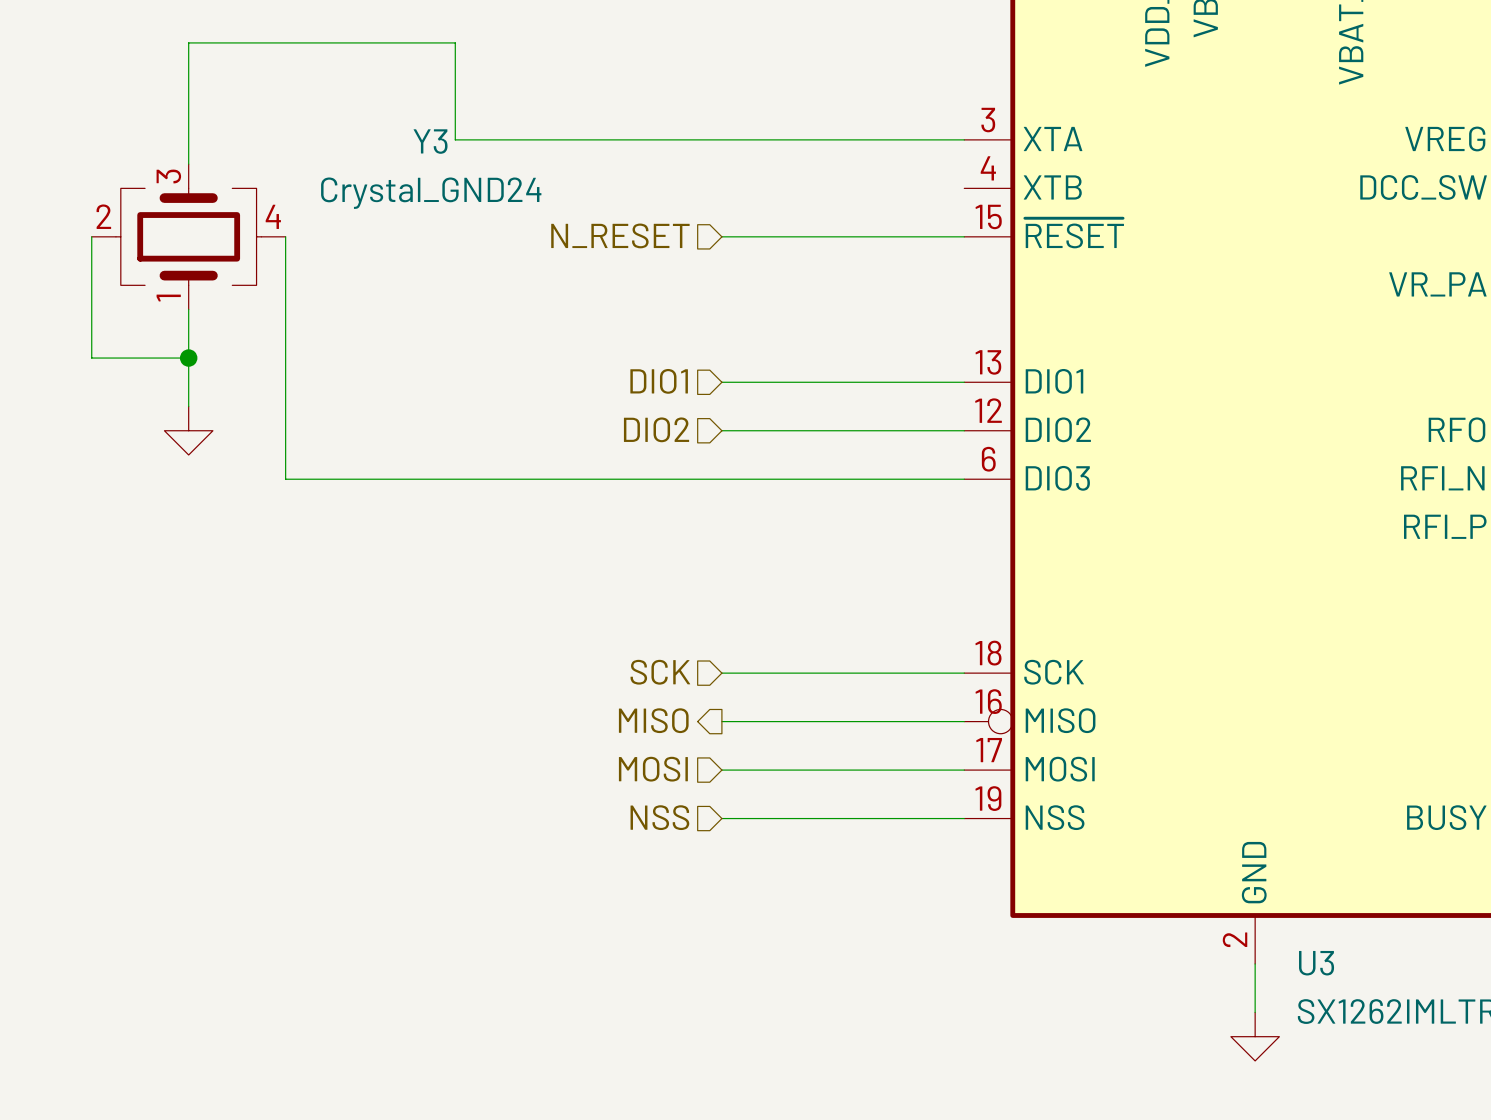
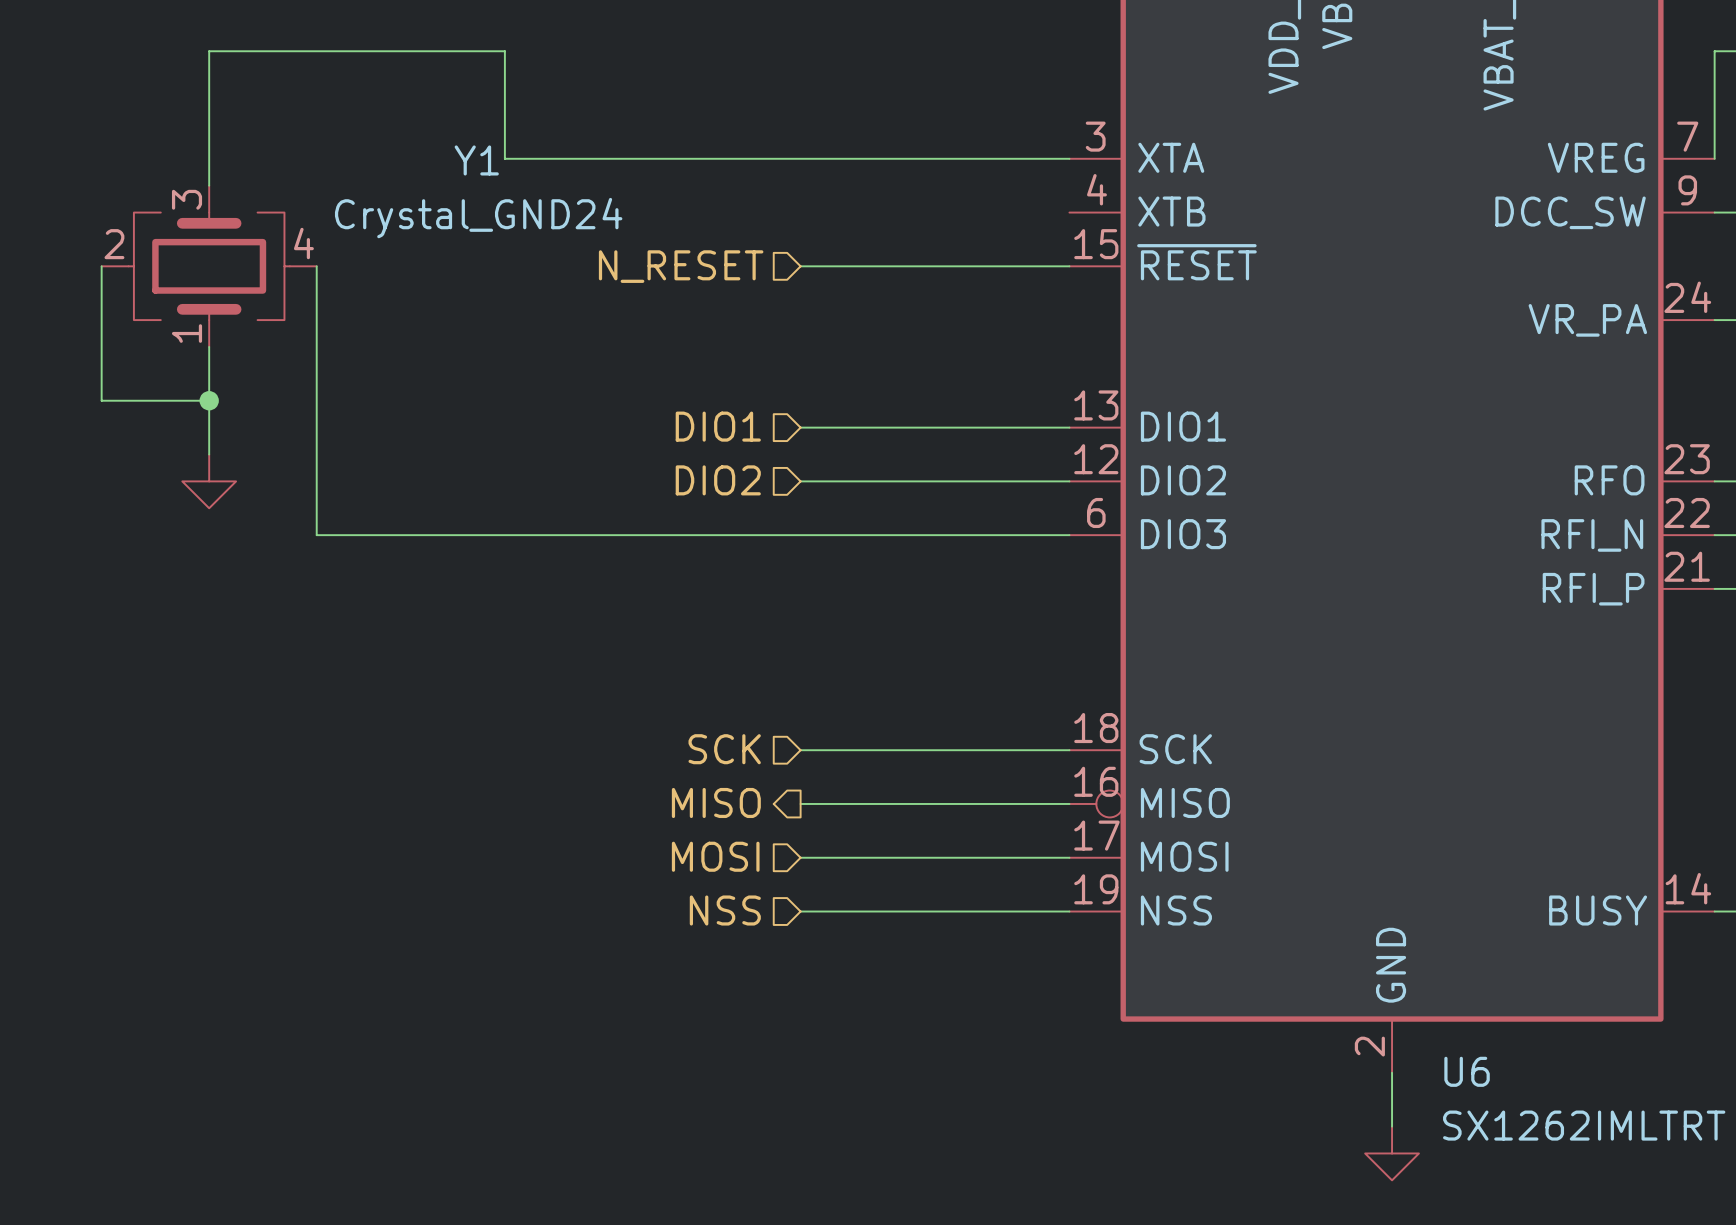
Y3 name: Y3 (430, 141) -> Y1 (476, 160)
U3 name: U3 (1316, 963) -> U6 (1467, 1071)

